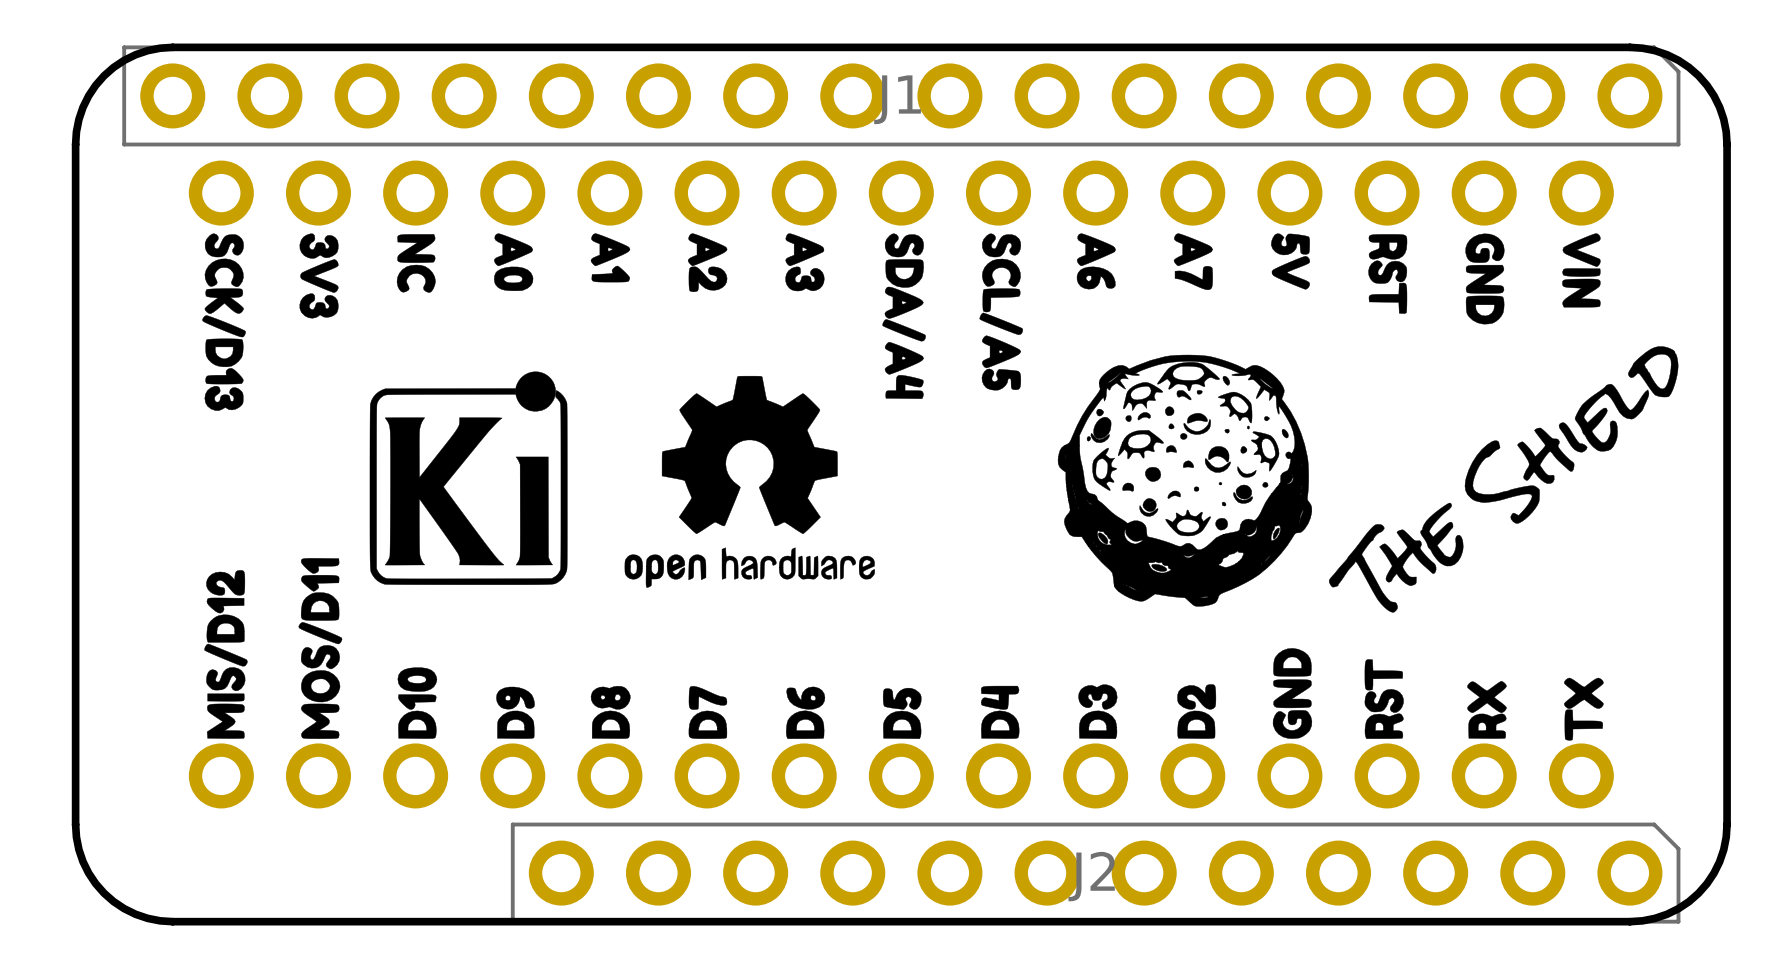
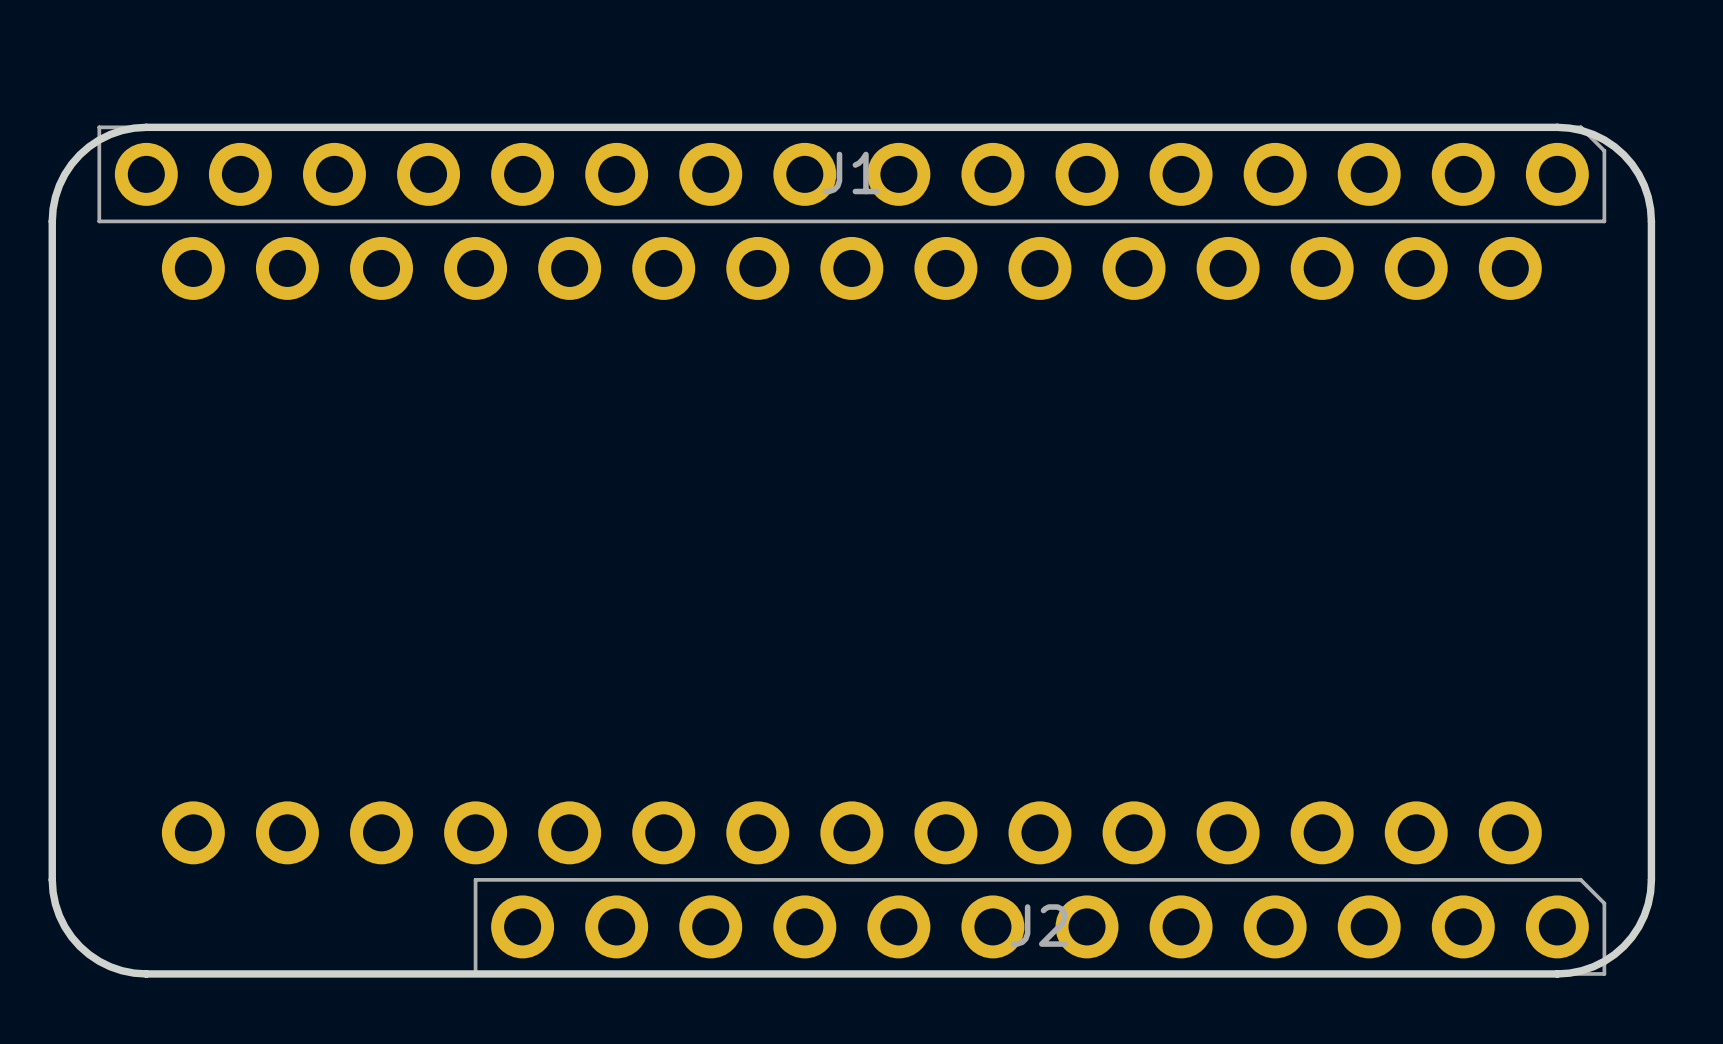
drawing: [202, 233, 1679, 741] -> none

